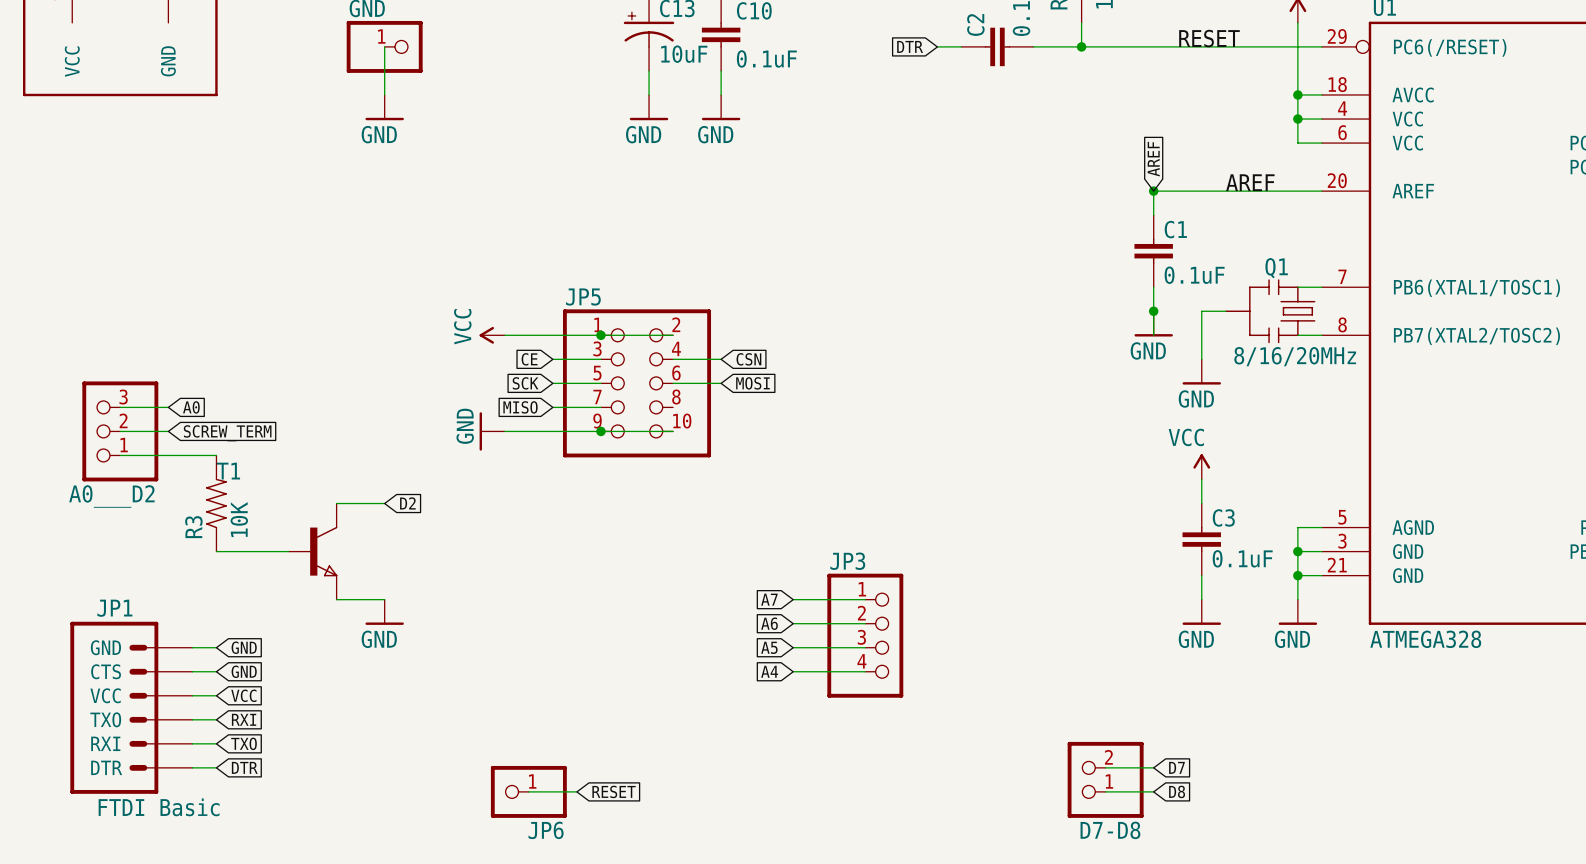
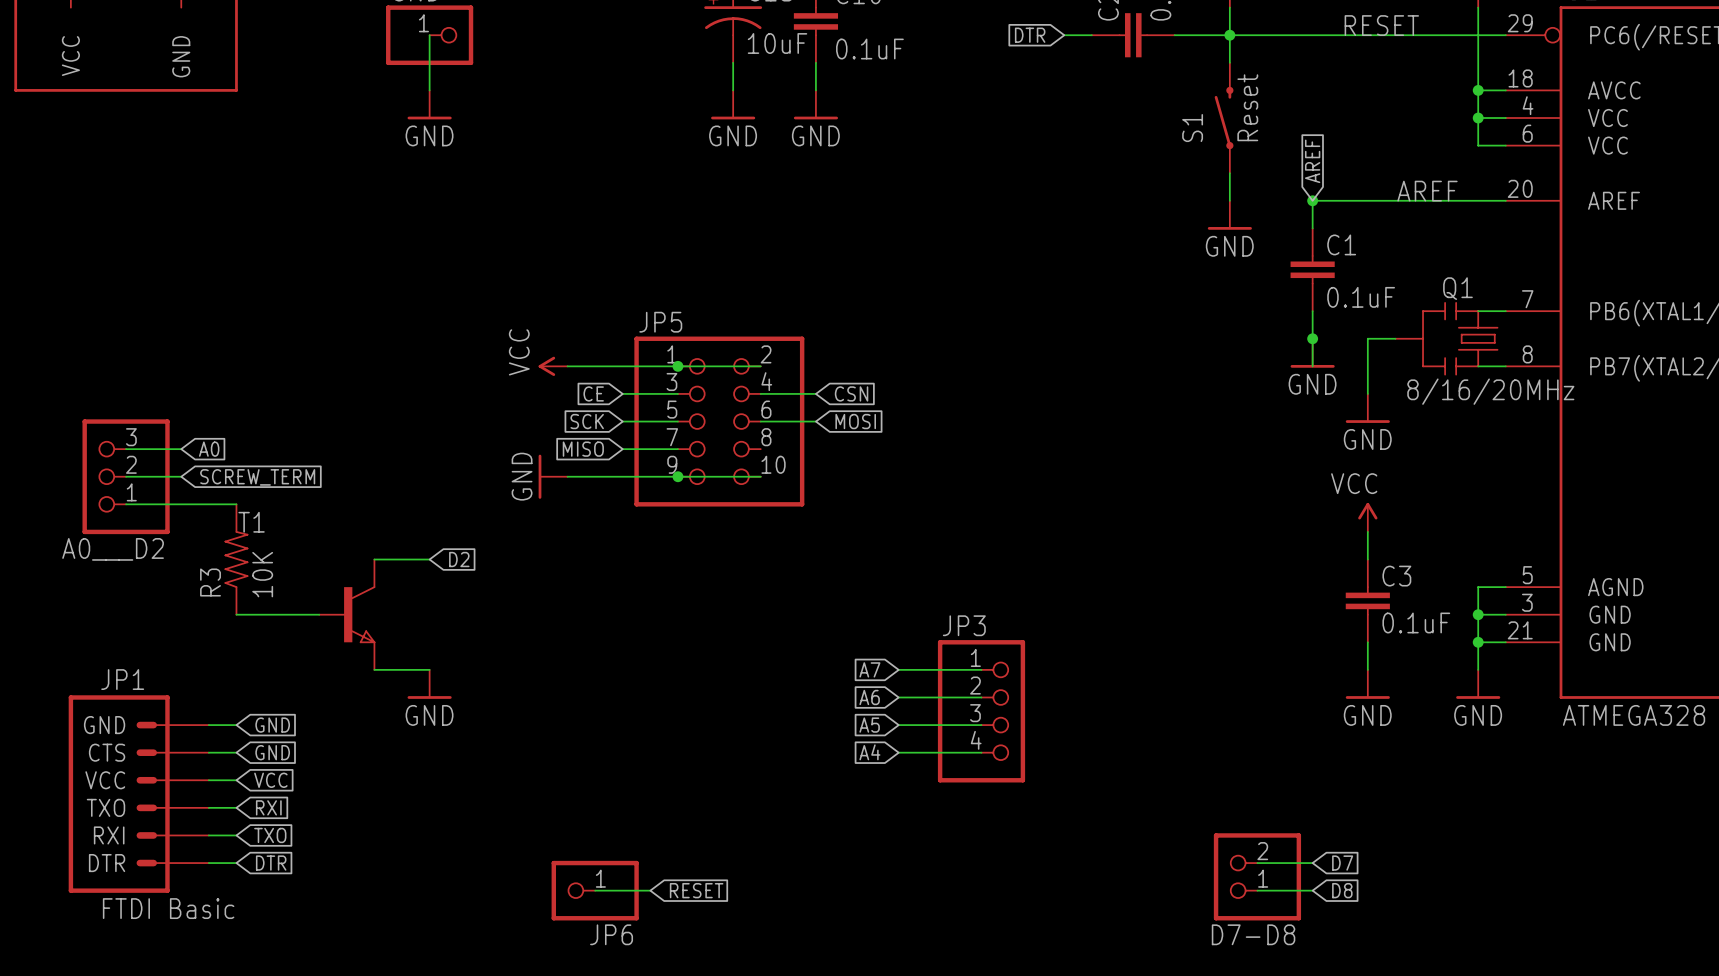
wire: none -> (1229, 35) (1229, 62)
S1: none -> Reset (1224, 118)
wire: none -> (1229, 173) (1229, 200)
power symbol: none -> GND (1229, 215)

